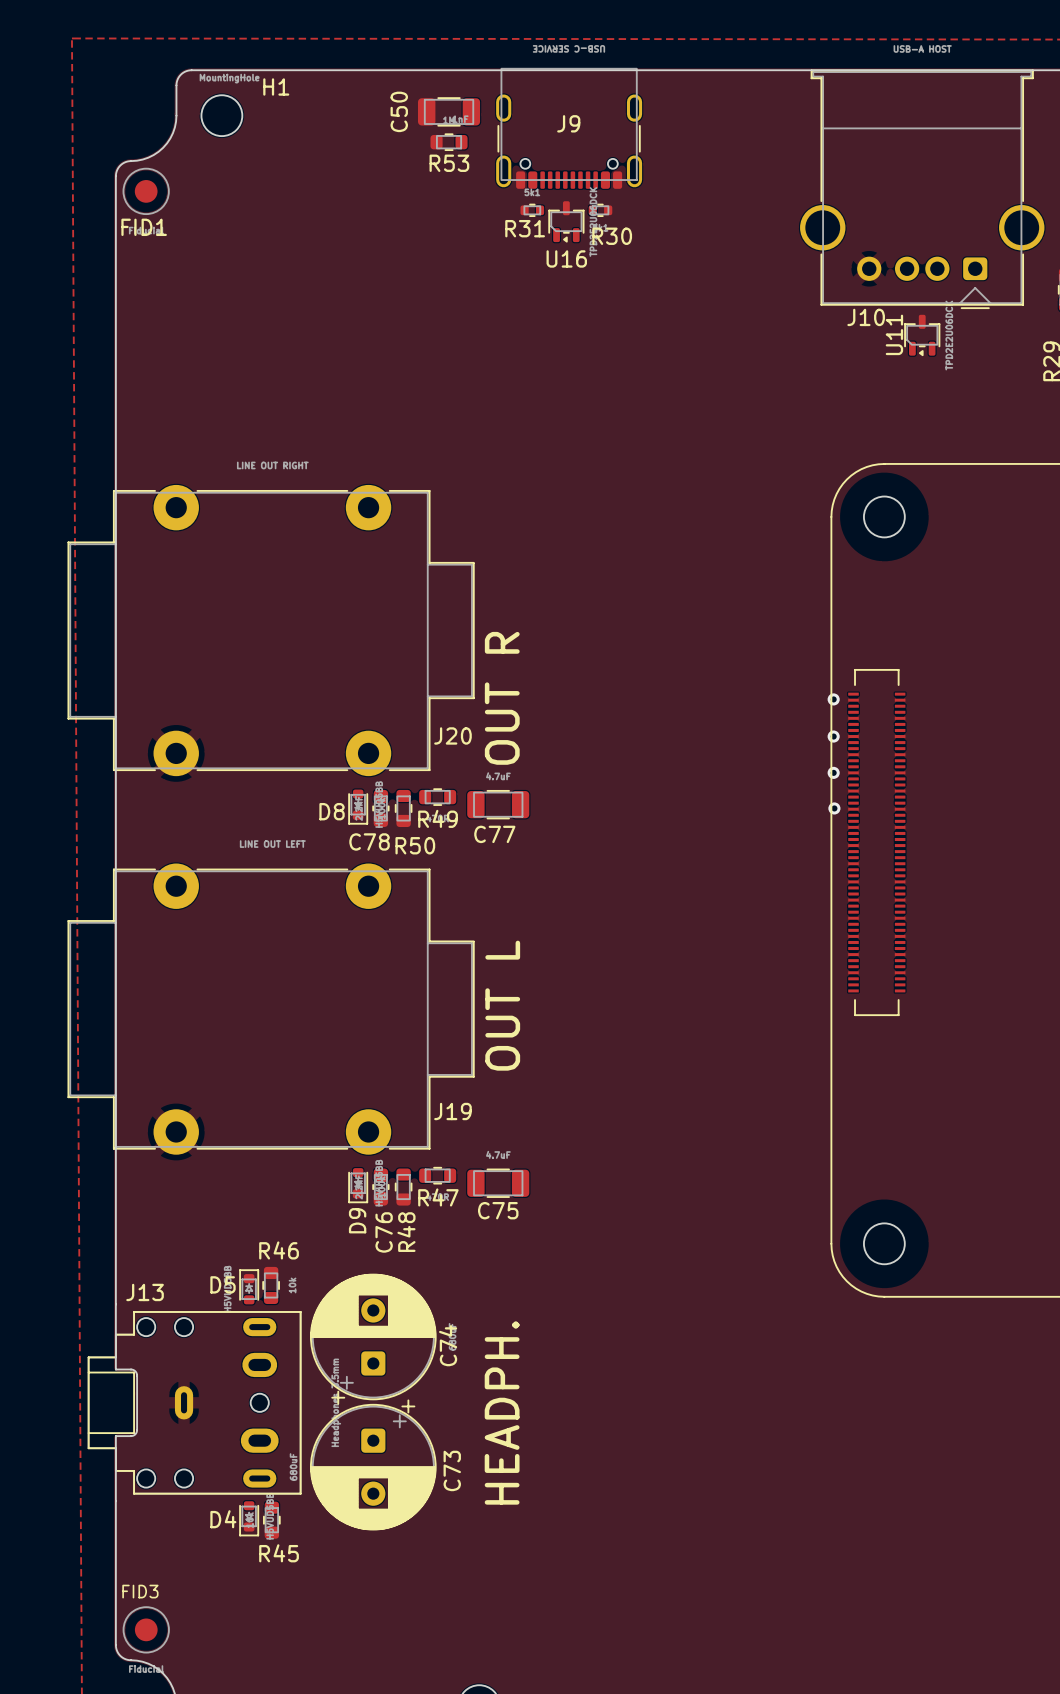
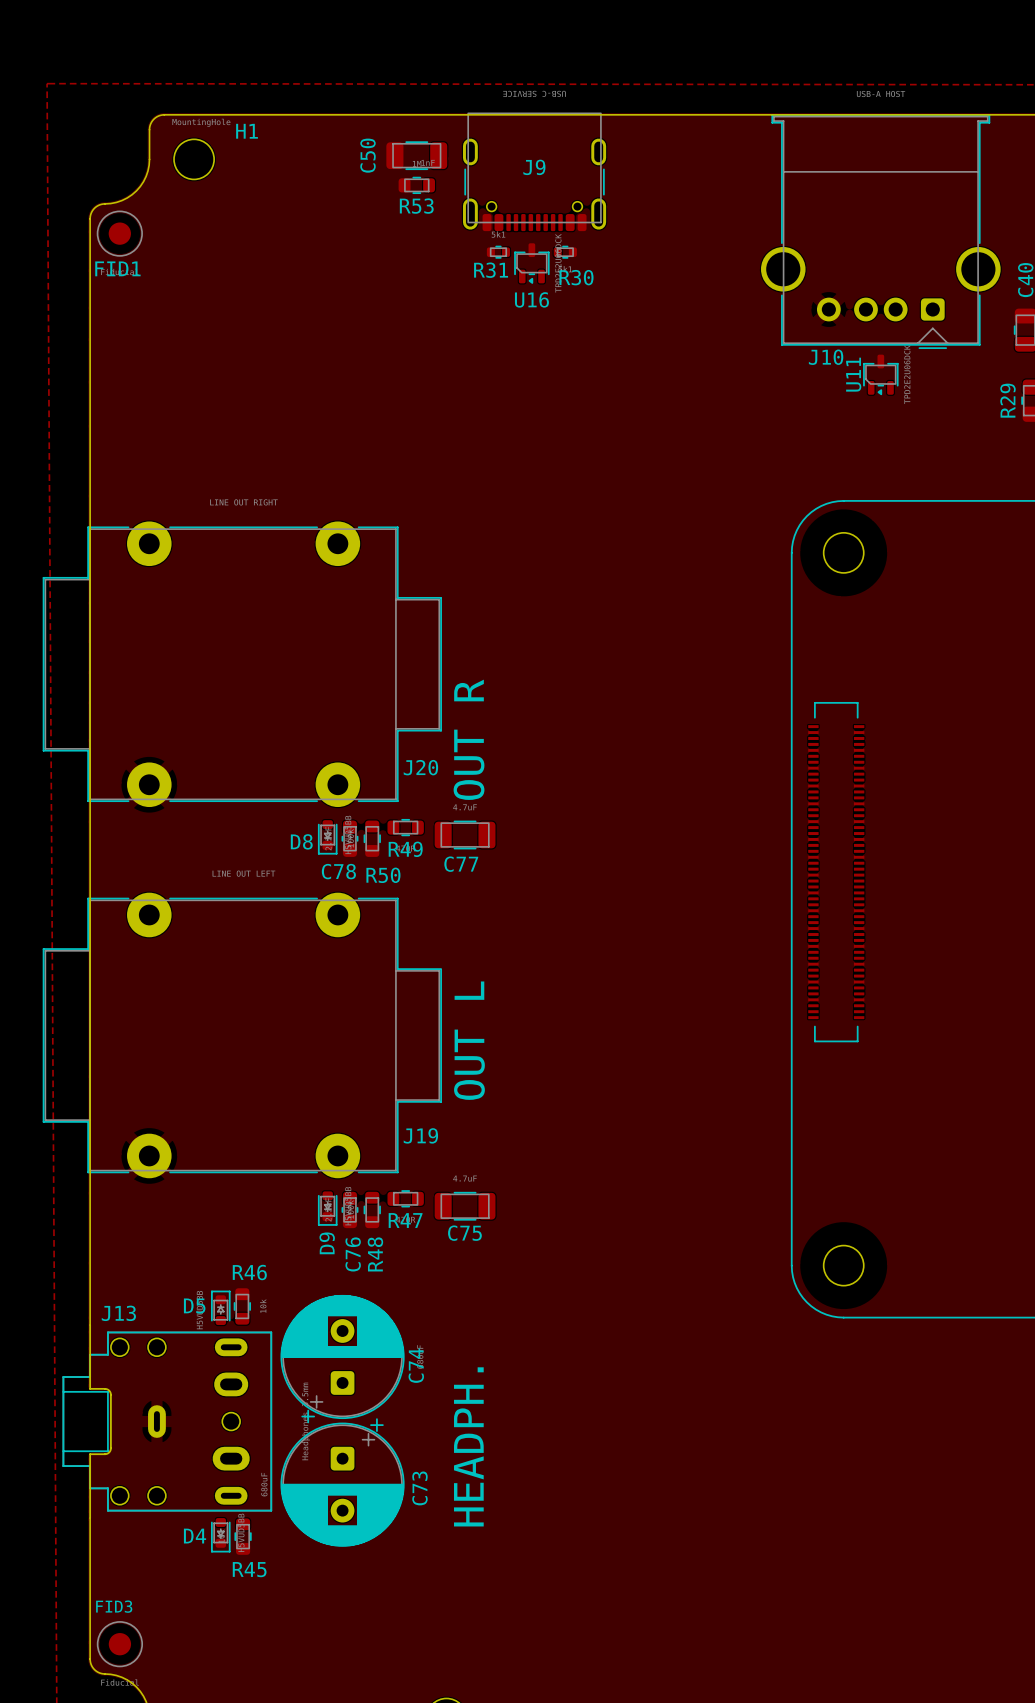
via: (833, 699) -> none
via: (833, 736) -> none
via: (833, 772) -> none
via: (834, 808) -> none

